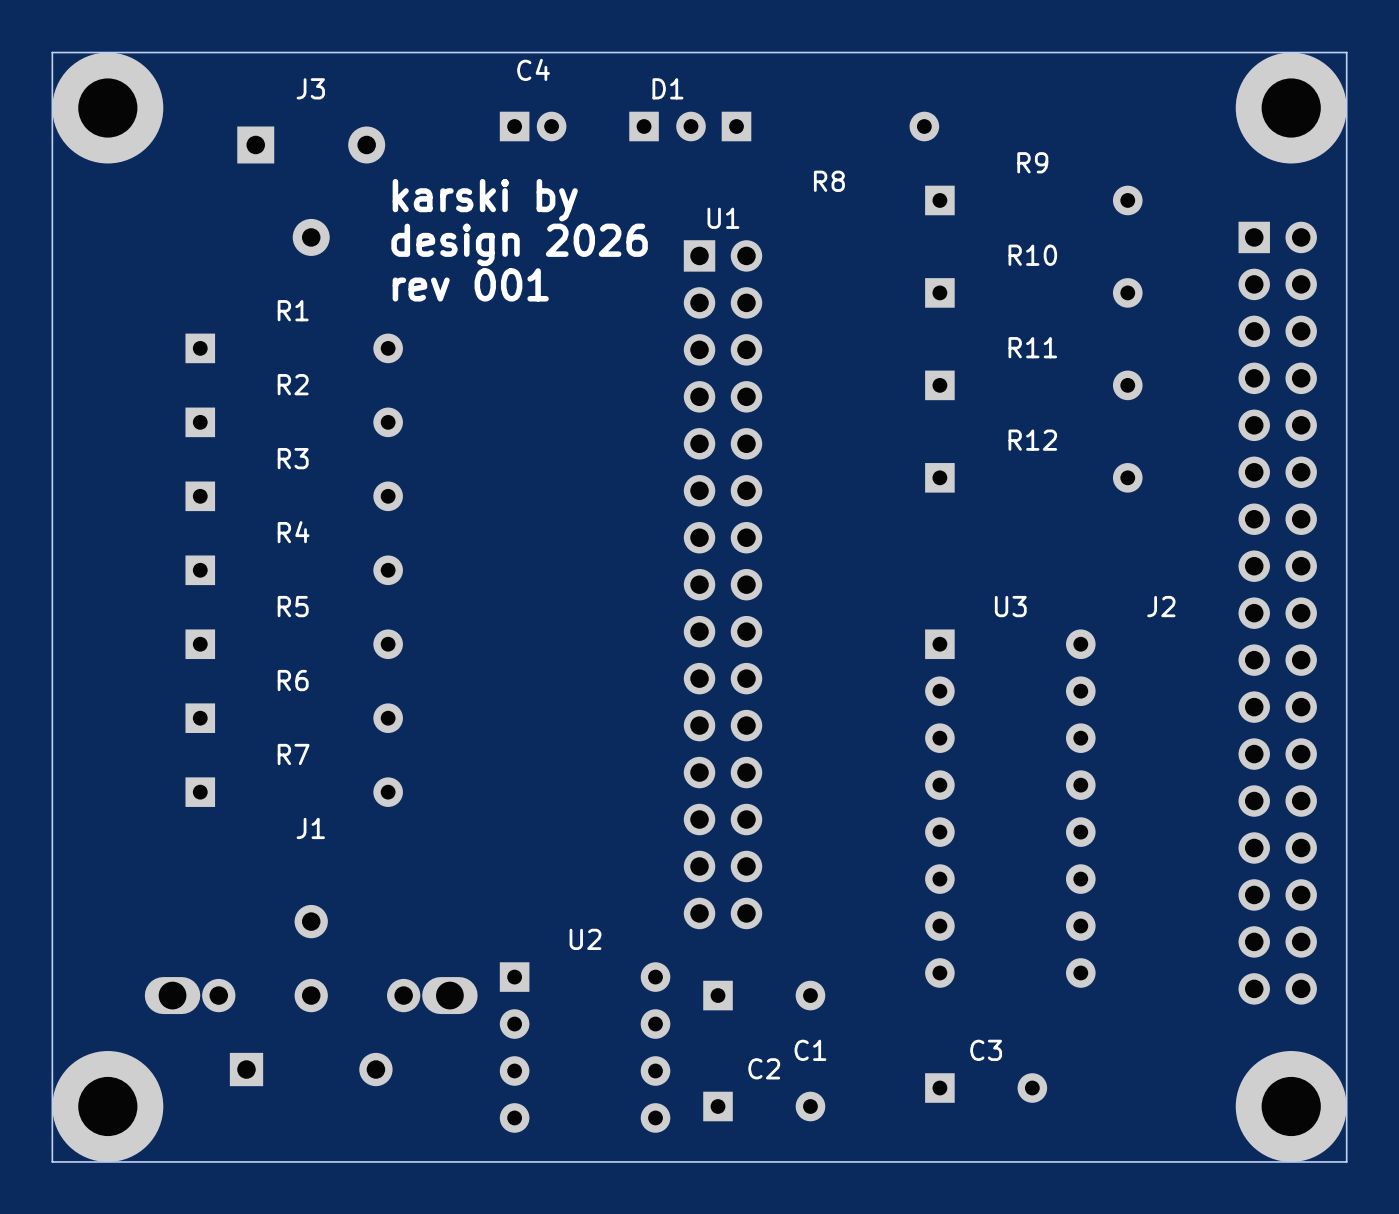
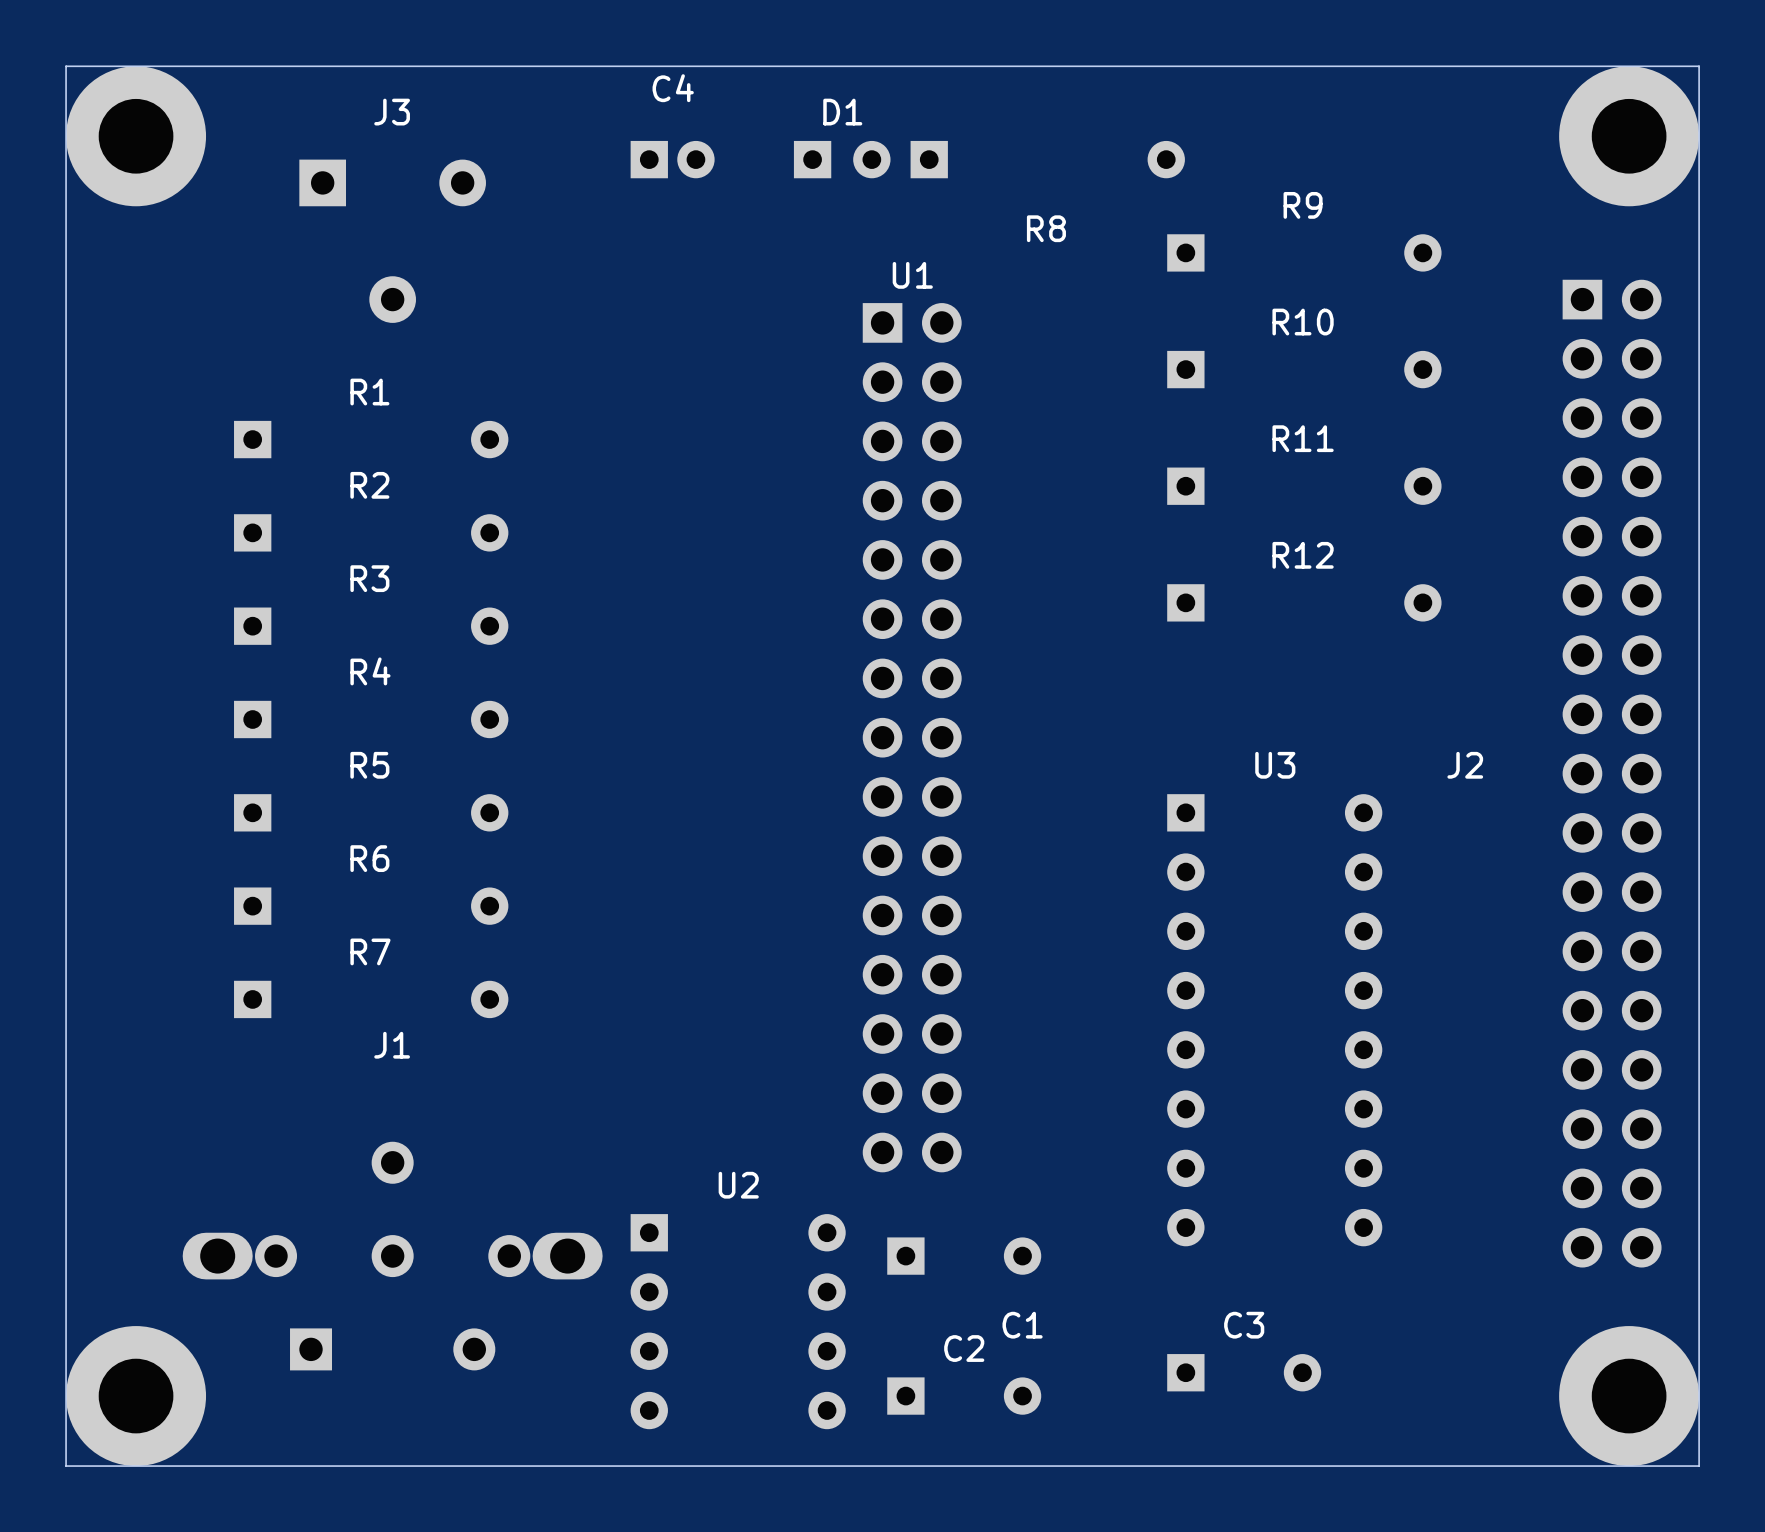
text: karski by (485, 200) -> none
text: design 2026 (519, 244) -> none
text: rev 001 (470, 284) -> none

